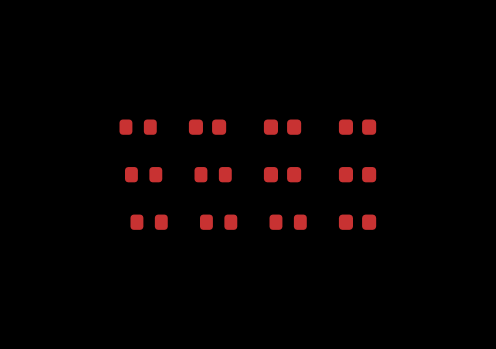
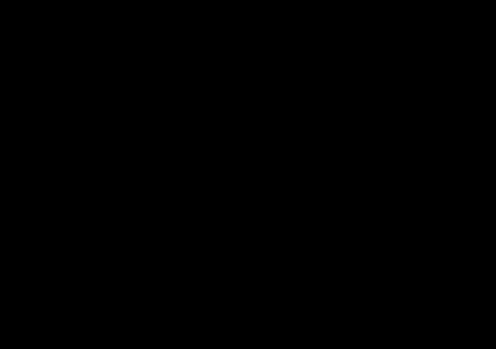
part: (138, 127) -> none
part: (207, 127) -> none
part: (282, 127) -> none
part: (357, 127) -> none
part: (143, 174) -> none
part: (213, 174) -> none
part: (282, 174) -> none
part: (357, 174) -> none
part: (149, 222) -> none
part: (218, 222) -> none
part: (288, 222) -> none
part: (357, 222) -> none

